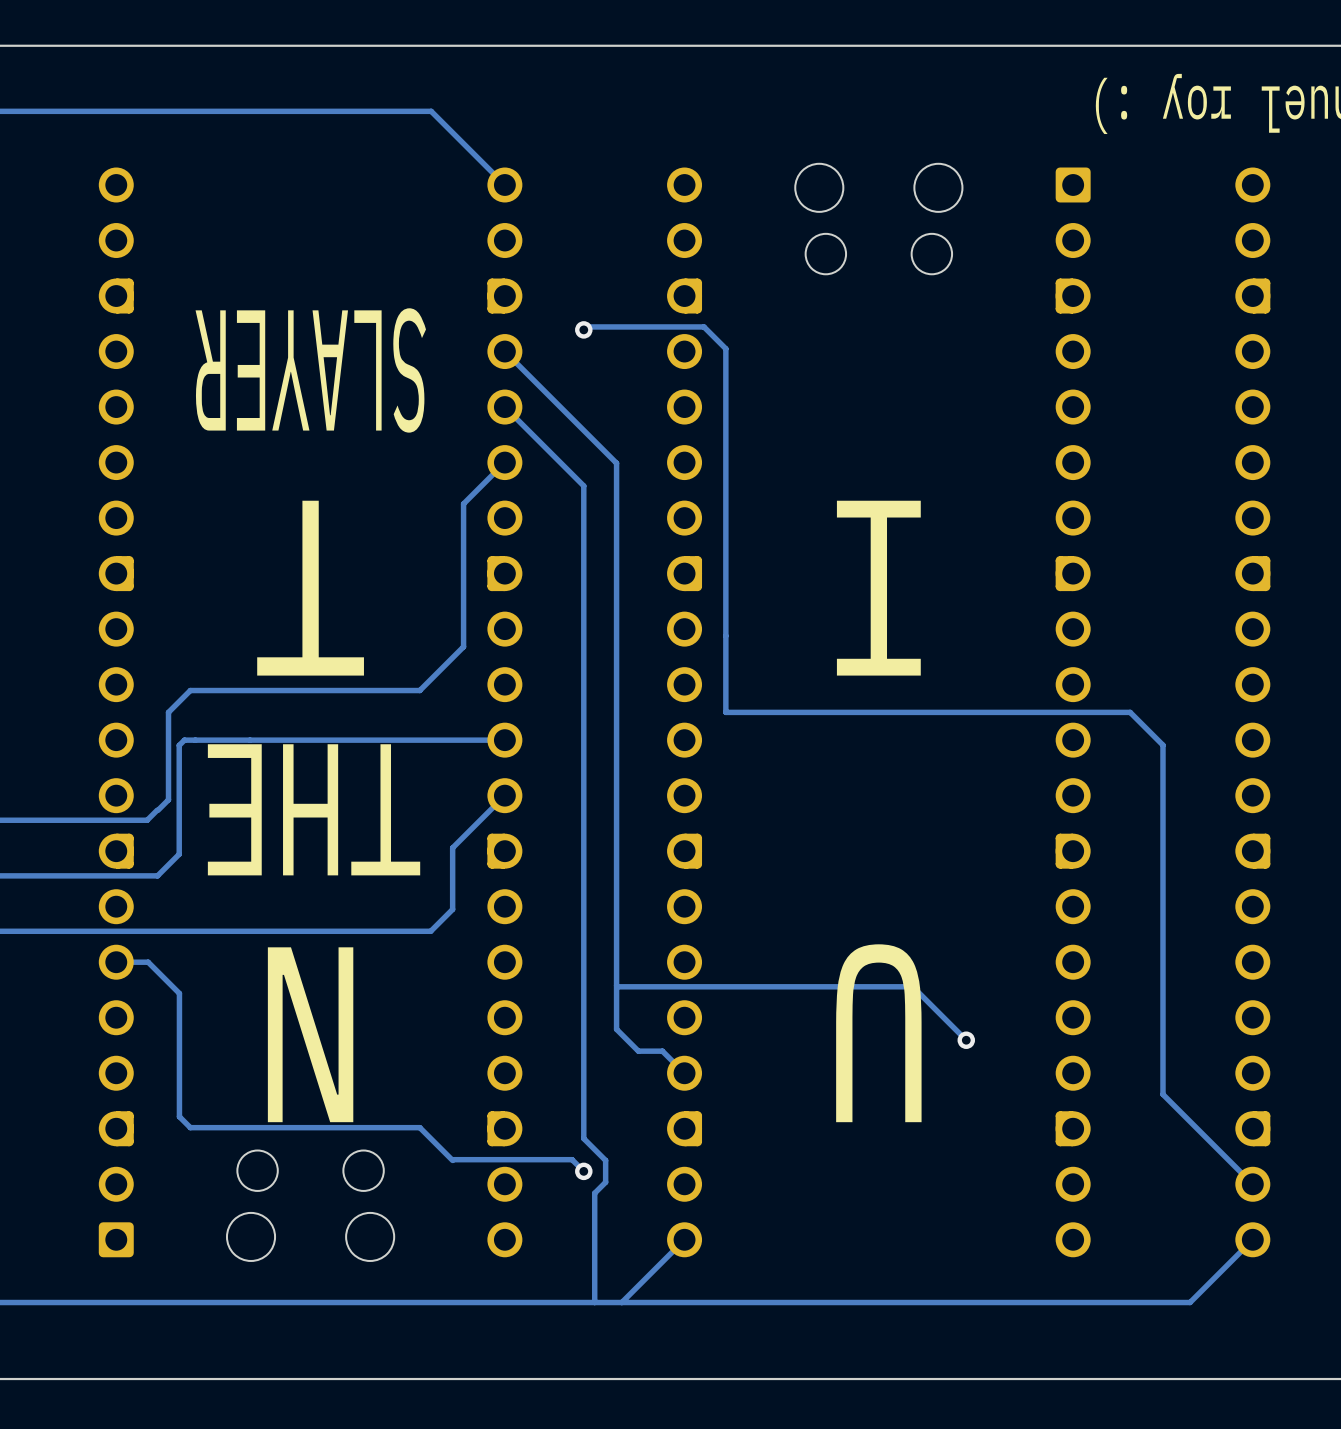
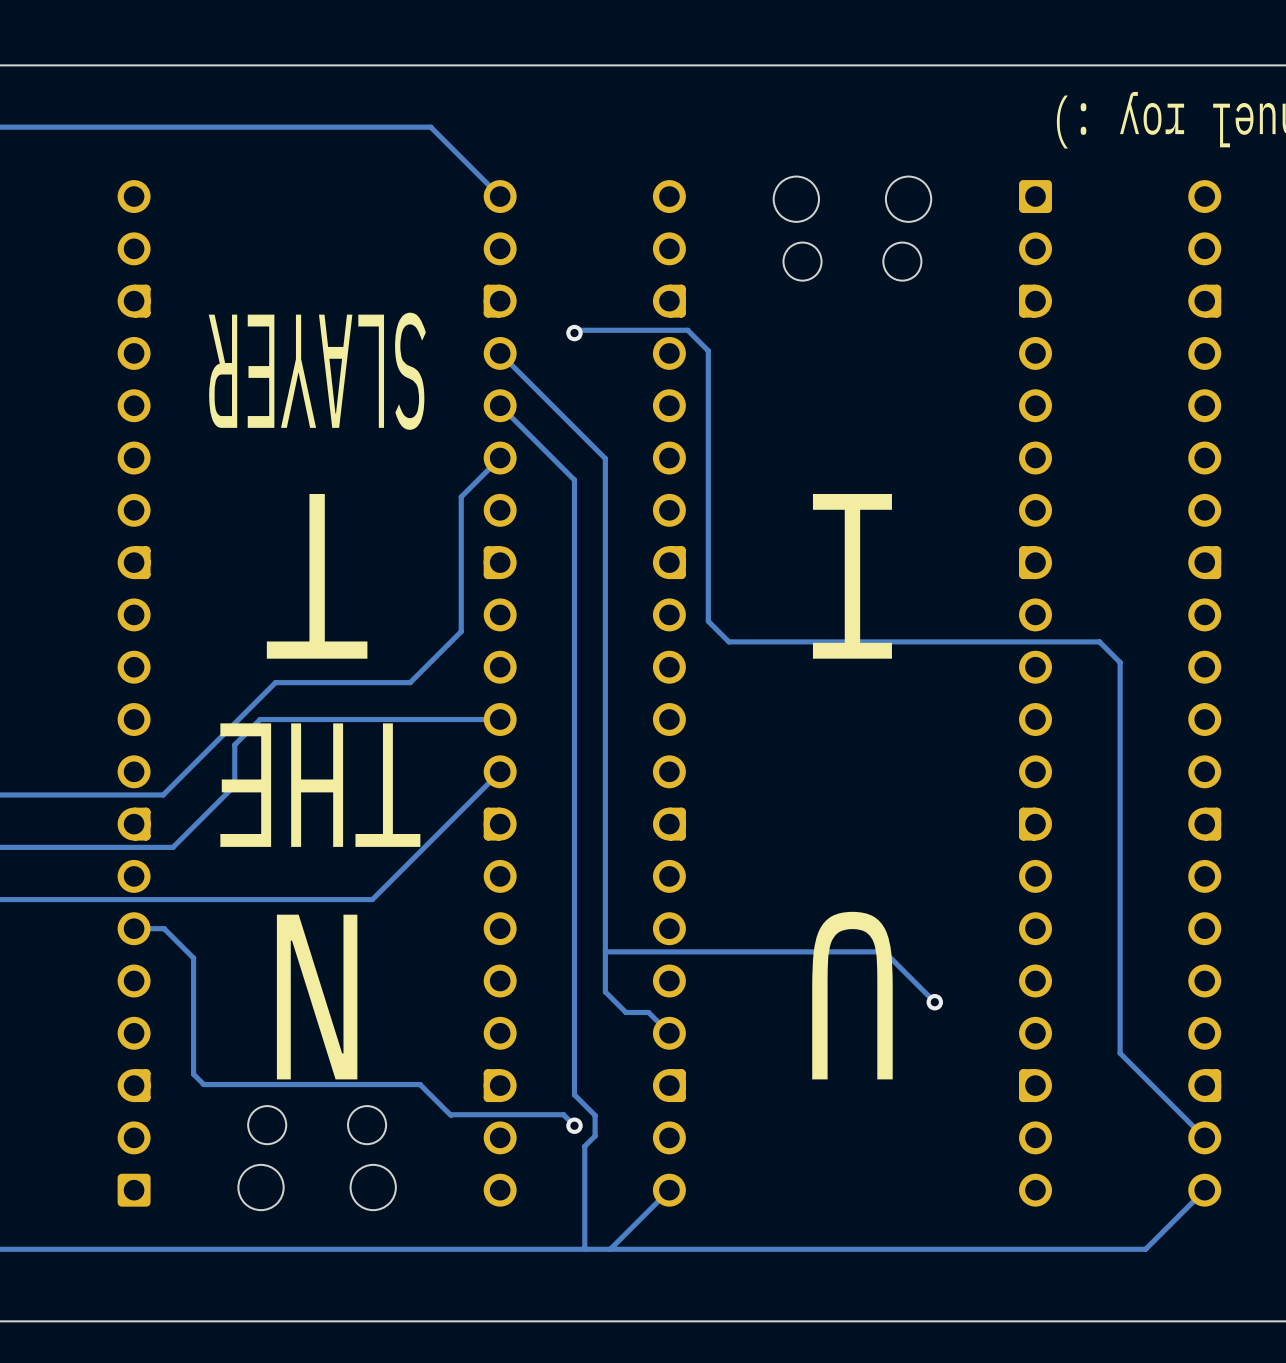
track: (725, 635) (725, 712) (1130, 712) (1162, 745) -> (708, 621) (728, 641) (1099, 641) (1120, 662) (1120, 724)
track: (419, 690) (190, 690) (168, 712) (168, 799) (158, 810) -> (420, 672) (410, 682) (275, 682) (172, 785)
track: (250, 740) (184, 740) (179, 745) (179, 854) -> (260, 719) (234, 744) (234, 785) (193, 826)
track: (452, 847) (452, 909) (430, 931) (369, 931) -> (450, 821) (372, 899)

